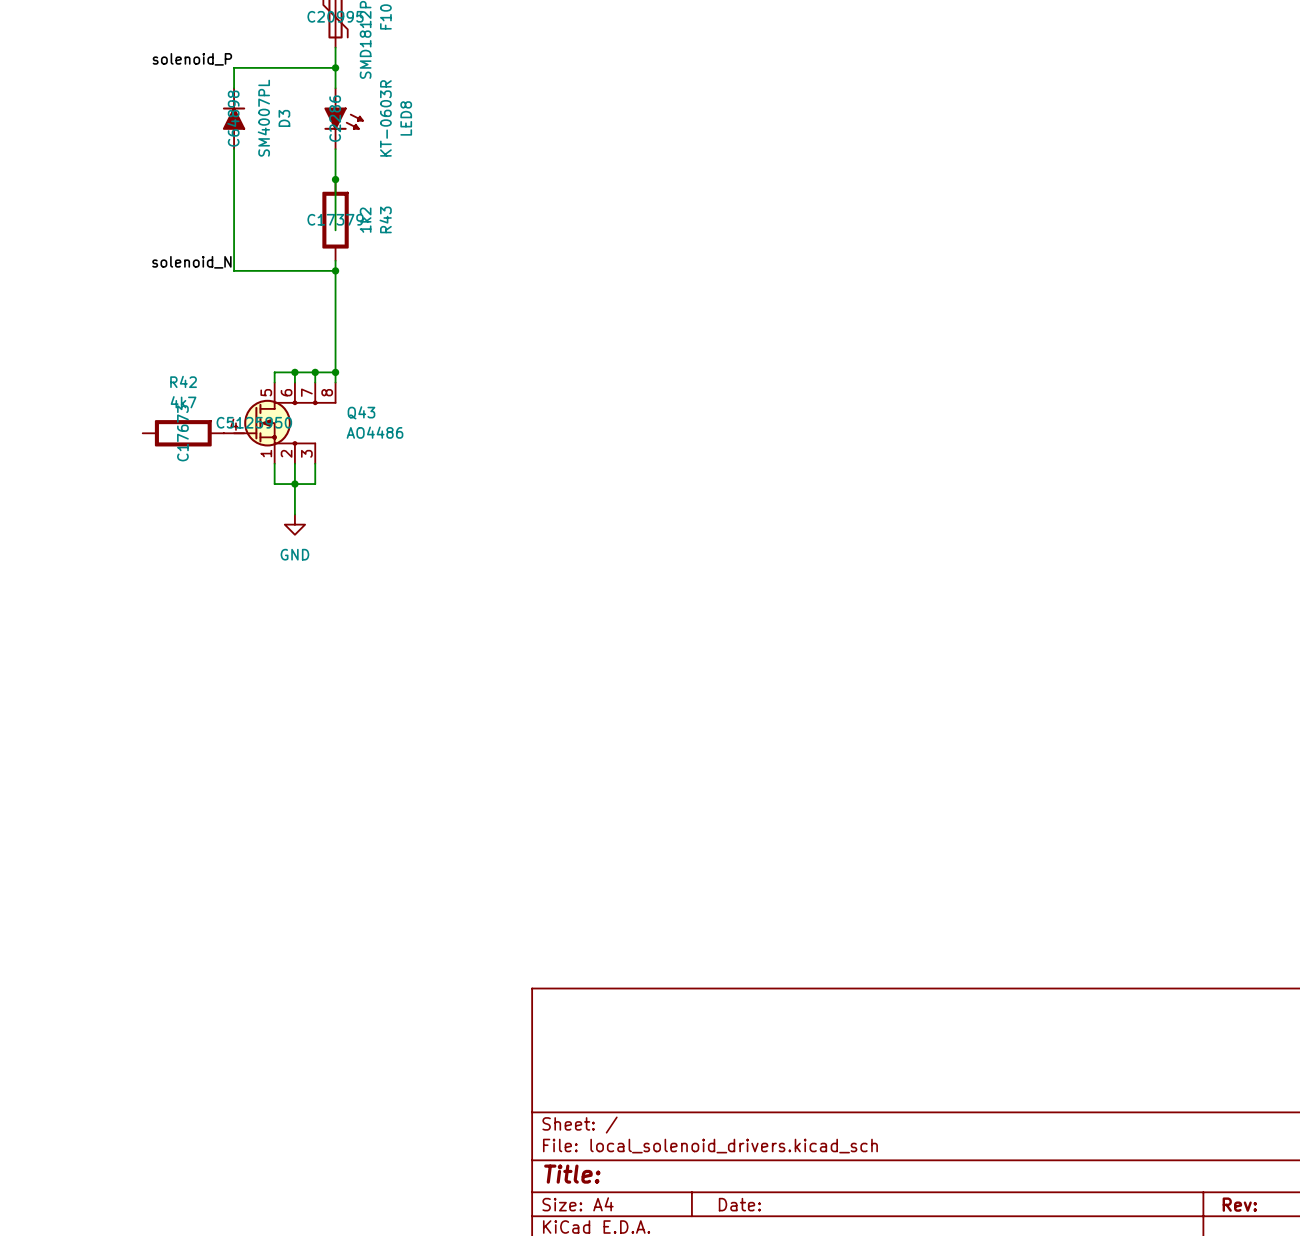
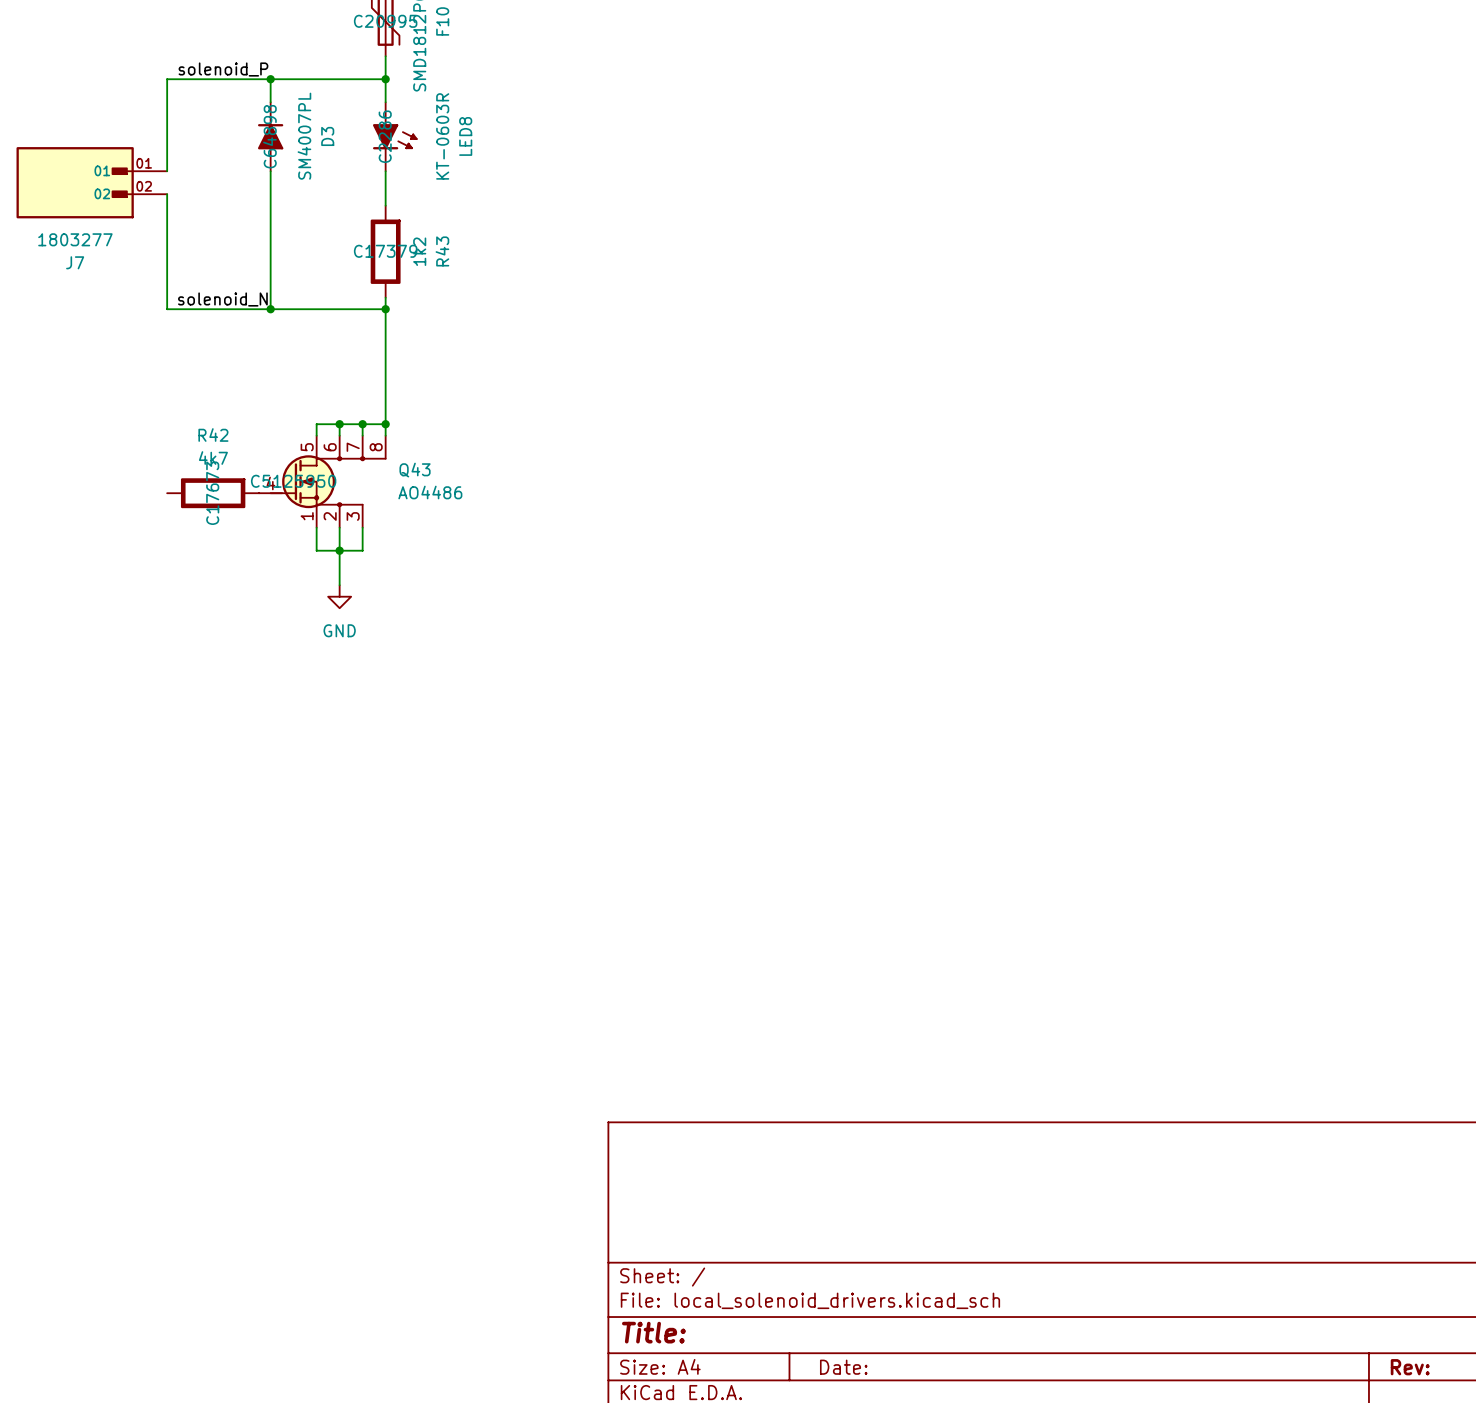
wire: none -> (270, 79) (167, 79) (167, 171)
junction: none -> (270, 79)
J7: none -> 1803277 (91, 182)
wire: none -> (167, 194) (167, 309) (270, 309)
wire: (335, 179) (335, 230) -> none
junction: (335, 179) -> none
junction: none -> (270, 309)

